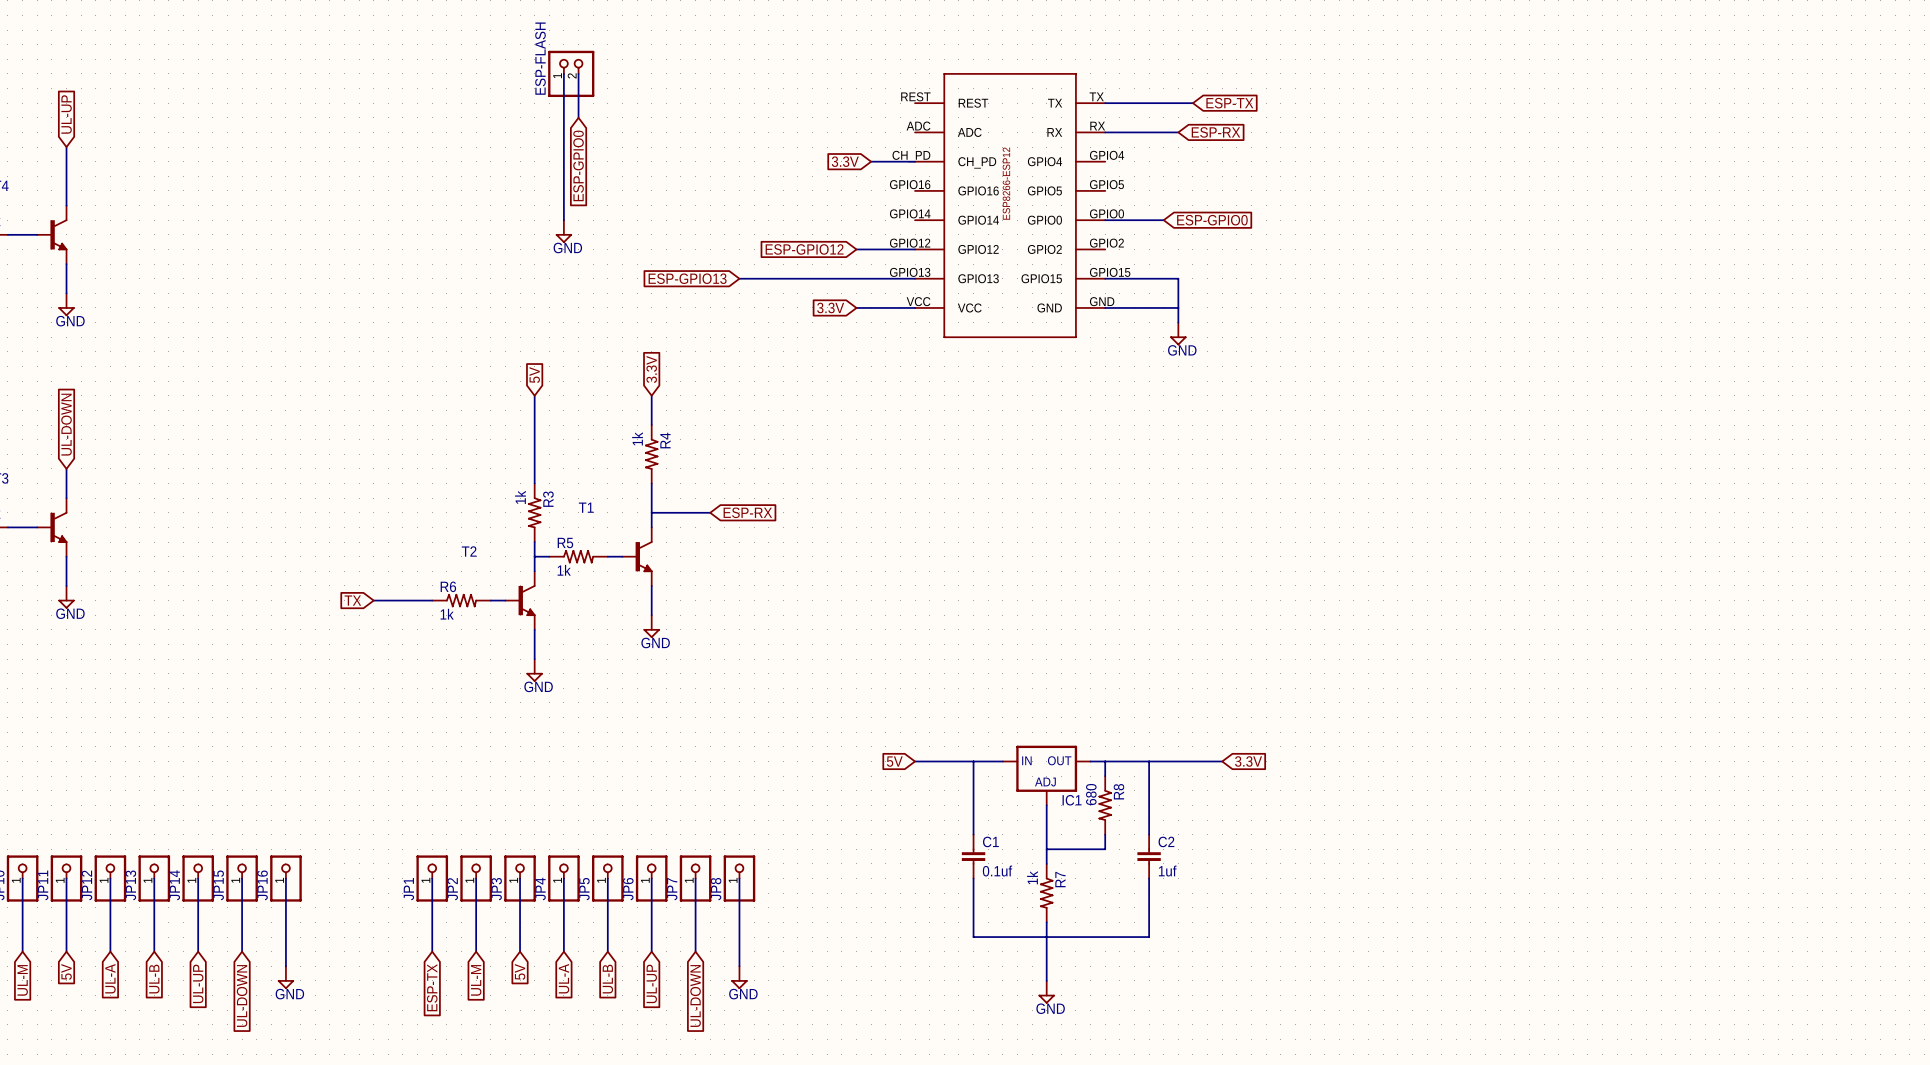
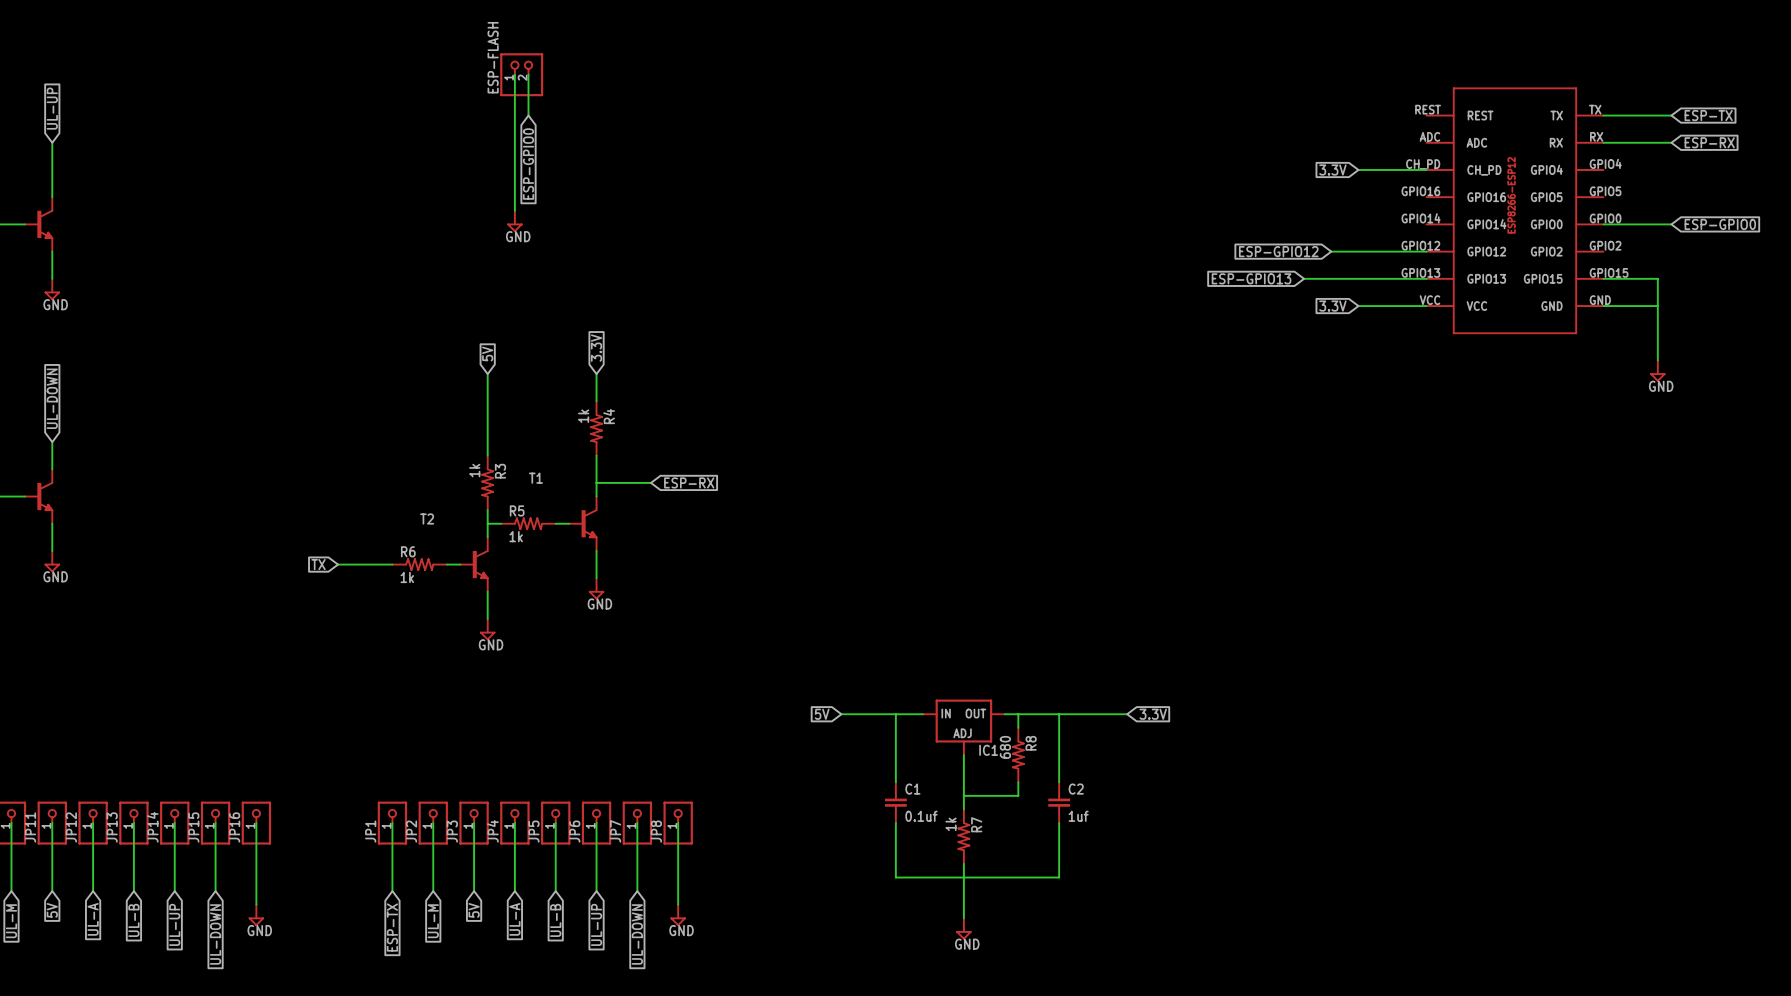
wire: (1105, 103) (1192, 103) -> none
global label: ESP-TX (1229, 103) -> none
wire: none -> (1603, 115) (1671, 115)
global label: none -> ESP-TX (1708, 115)
wire: (1105, 132) (1178, 132) -> none
global label: ESP-RX (1215, 132) -> none
wire: none -> (1603, 142) (1671, 142)
global label: none -> ESP-RX (1709, 142)
global label: 3.3V (845, 161) -> none
wire: (871, 161) (915, 161) -> none
global label: none -> 3.3V (1332, 169)
wire: none -> (1358, 169) (1426, 169)
part: (1010, 205) -> none
wire: (1105, 220) (1163, 220) -> none
global label: ESP-GPIO0 (1212, 220) -> none
part: none -> (1514, 210)
wire: none -> (1603, 224) (1671, 224)
global label: none -> ESP-GPIO0 (1720, 224)
global label: ESP-GPIO12 (804, 249) -> none
wire: (856, 249) (915, 249) -> none
global label: none -> ESP-GPIO12 (1278, 251)
wire: none -> (1331, 251) (1426, 251)
global label: ESP-GPIO13 (687, 278) -> none
wire: (739, 278) (915, 278) -> none
wire: (1105, 278) (1178, 278) (1178, 322) -> none
global label: none -> ESP-GPIO13 (1251, 278)
wire: none -> (1304, 278) (1426, 278)
wire: none -> (1603, 278) (1657, 278) (1657, 360)
global label: 3.3V (830, 307) -> none
wire: (856, 307) (915, 307) -> none
wire: (1105, 307) (1178, 307) -> none
global label: none -> 3.3V (1332, 306)
wire: none -> (1358, 306) (1426, 306)
wire: none -> (1603, 306) (1657, 306)
power symbol: GND (1178, 333) -> none
power symbol: none -> GND (1657, 371)

